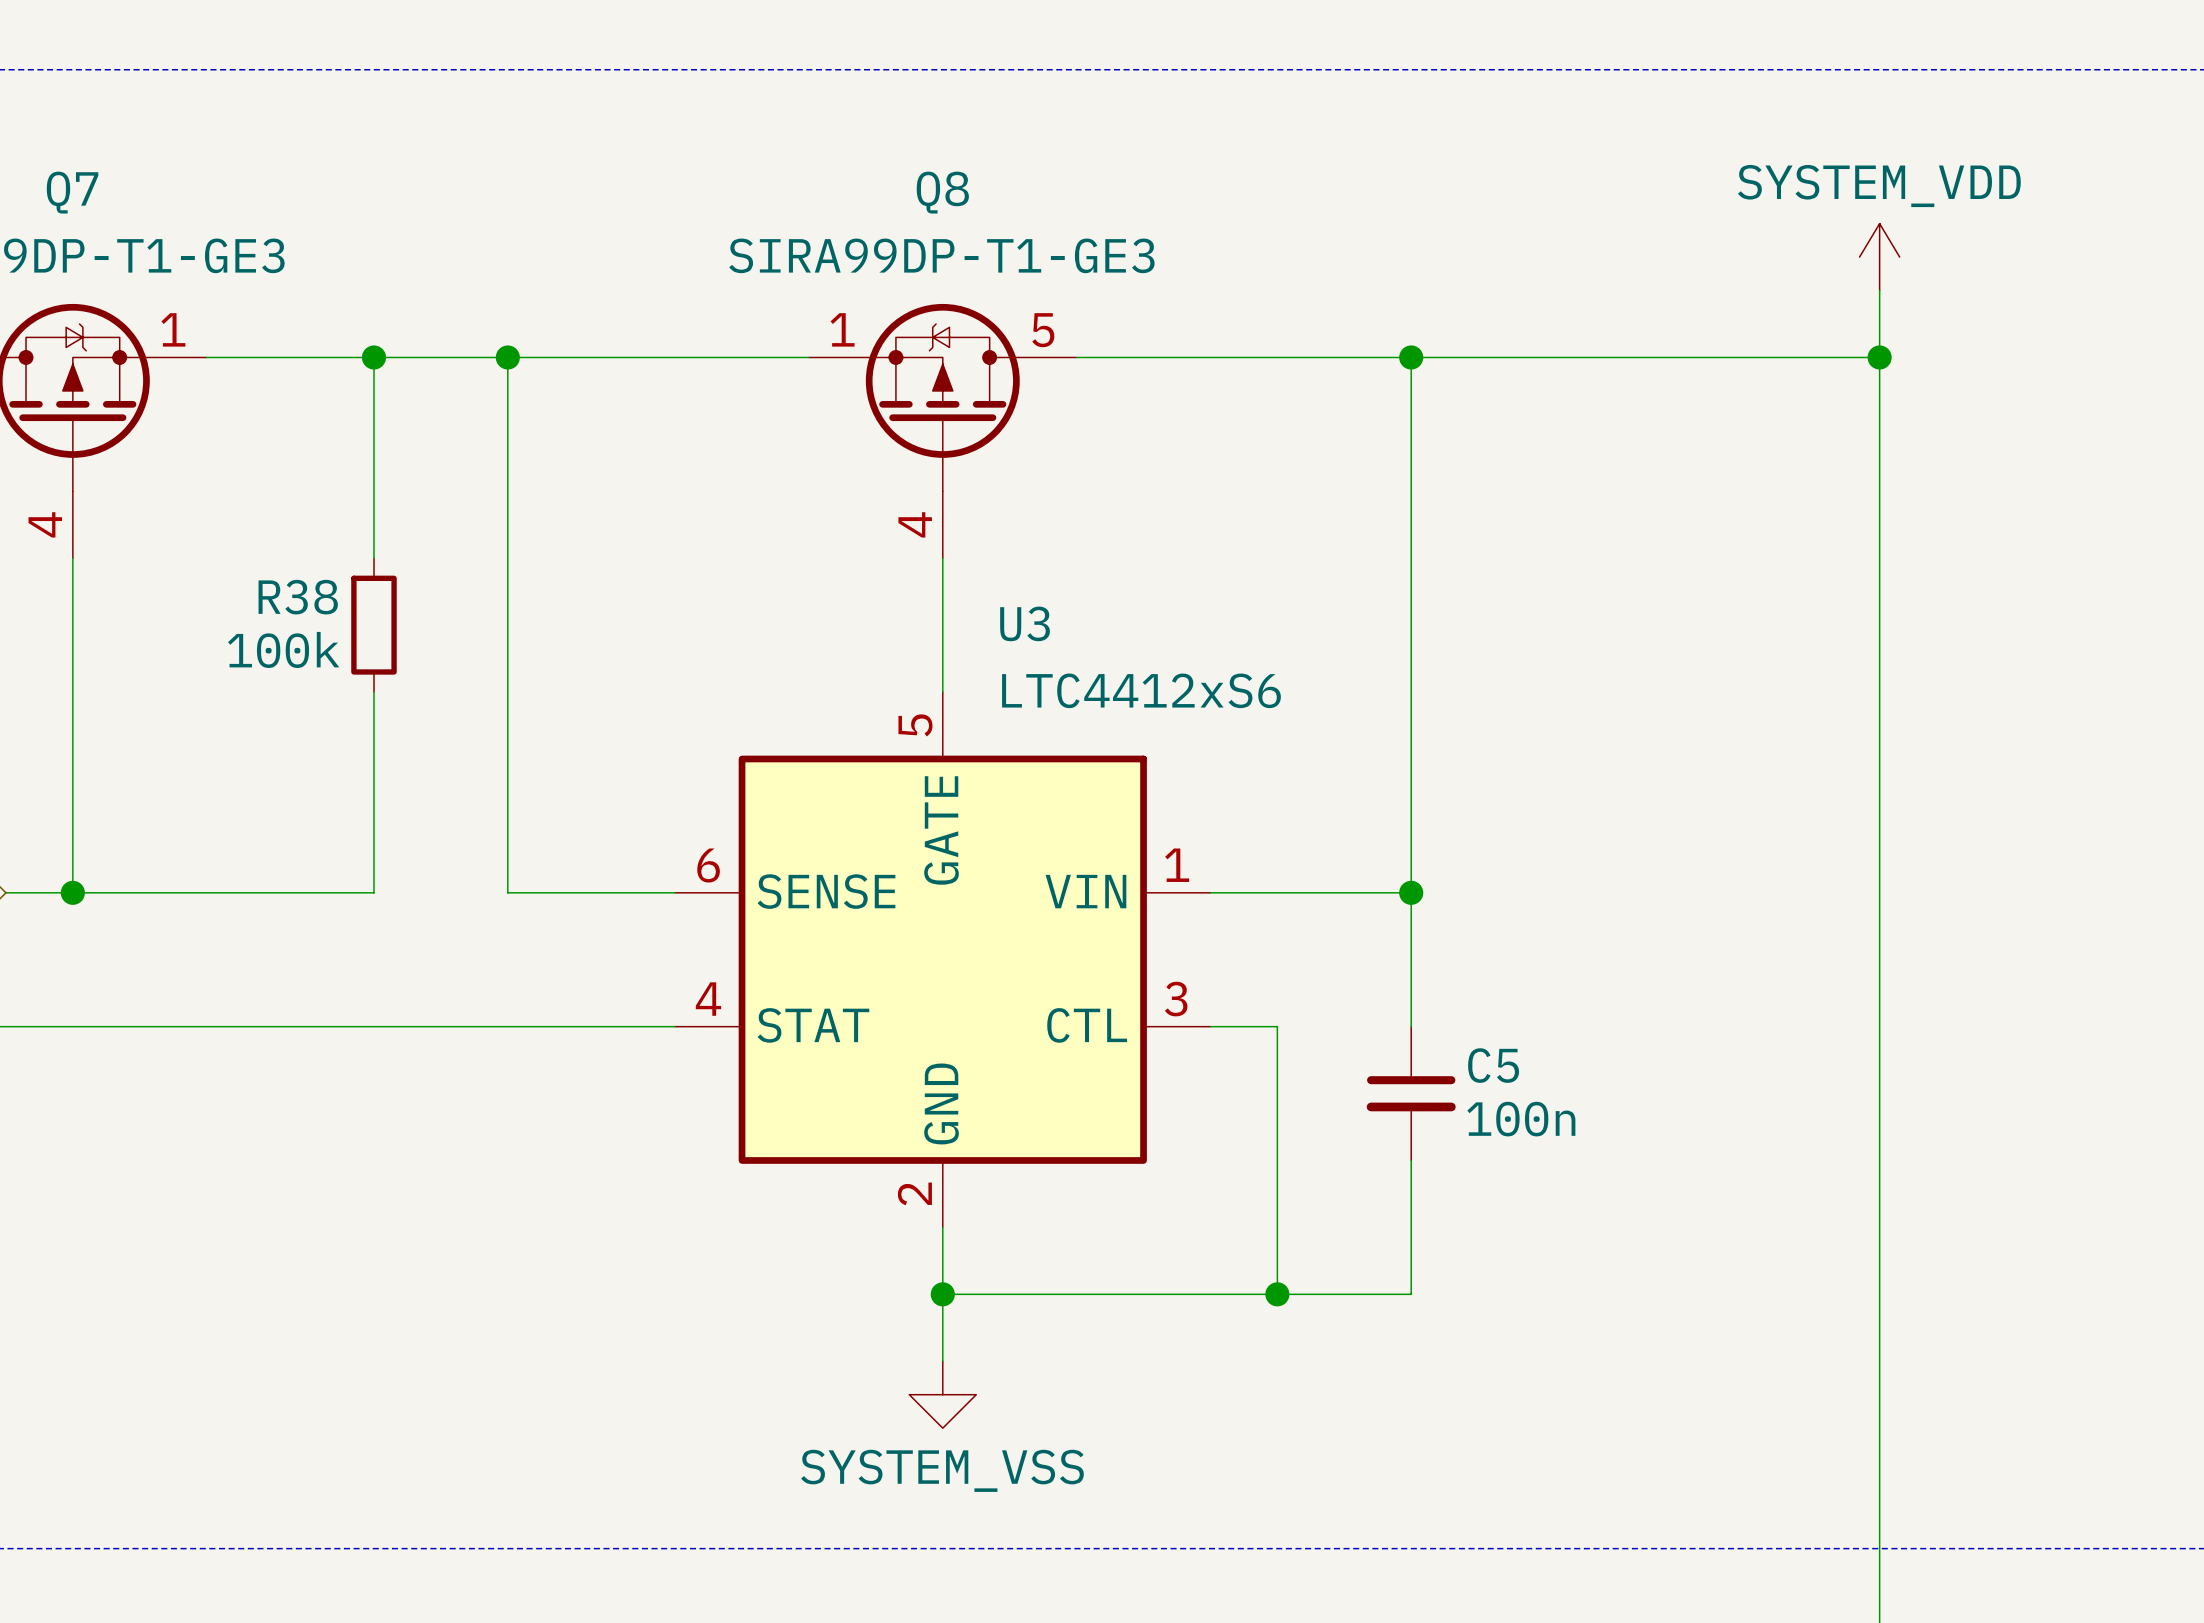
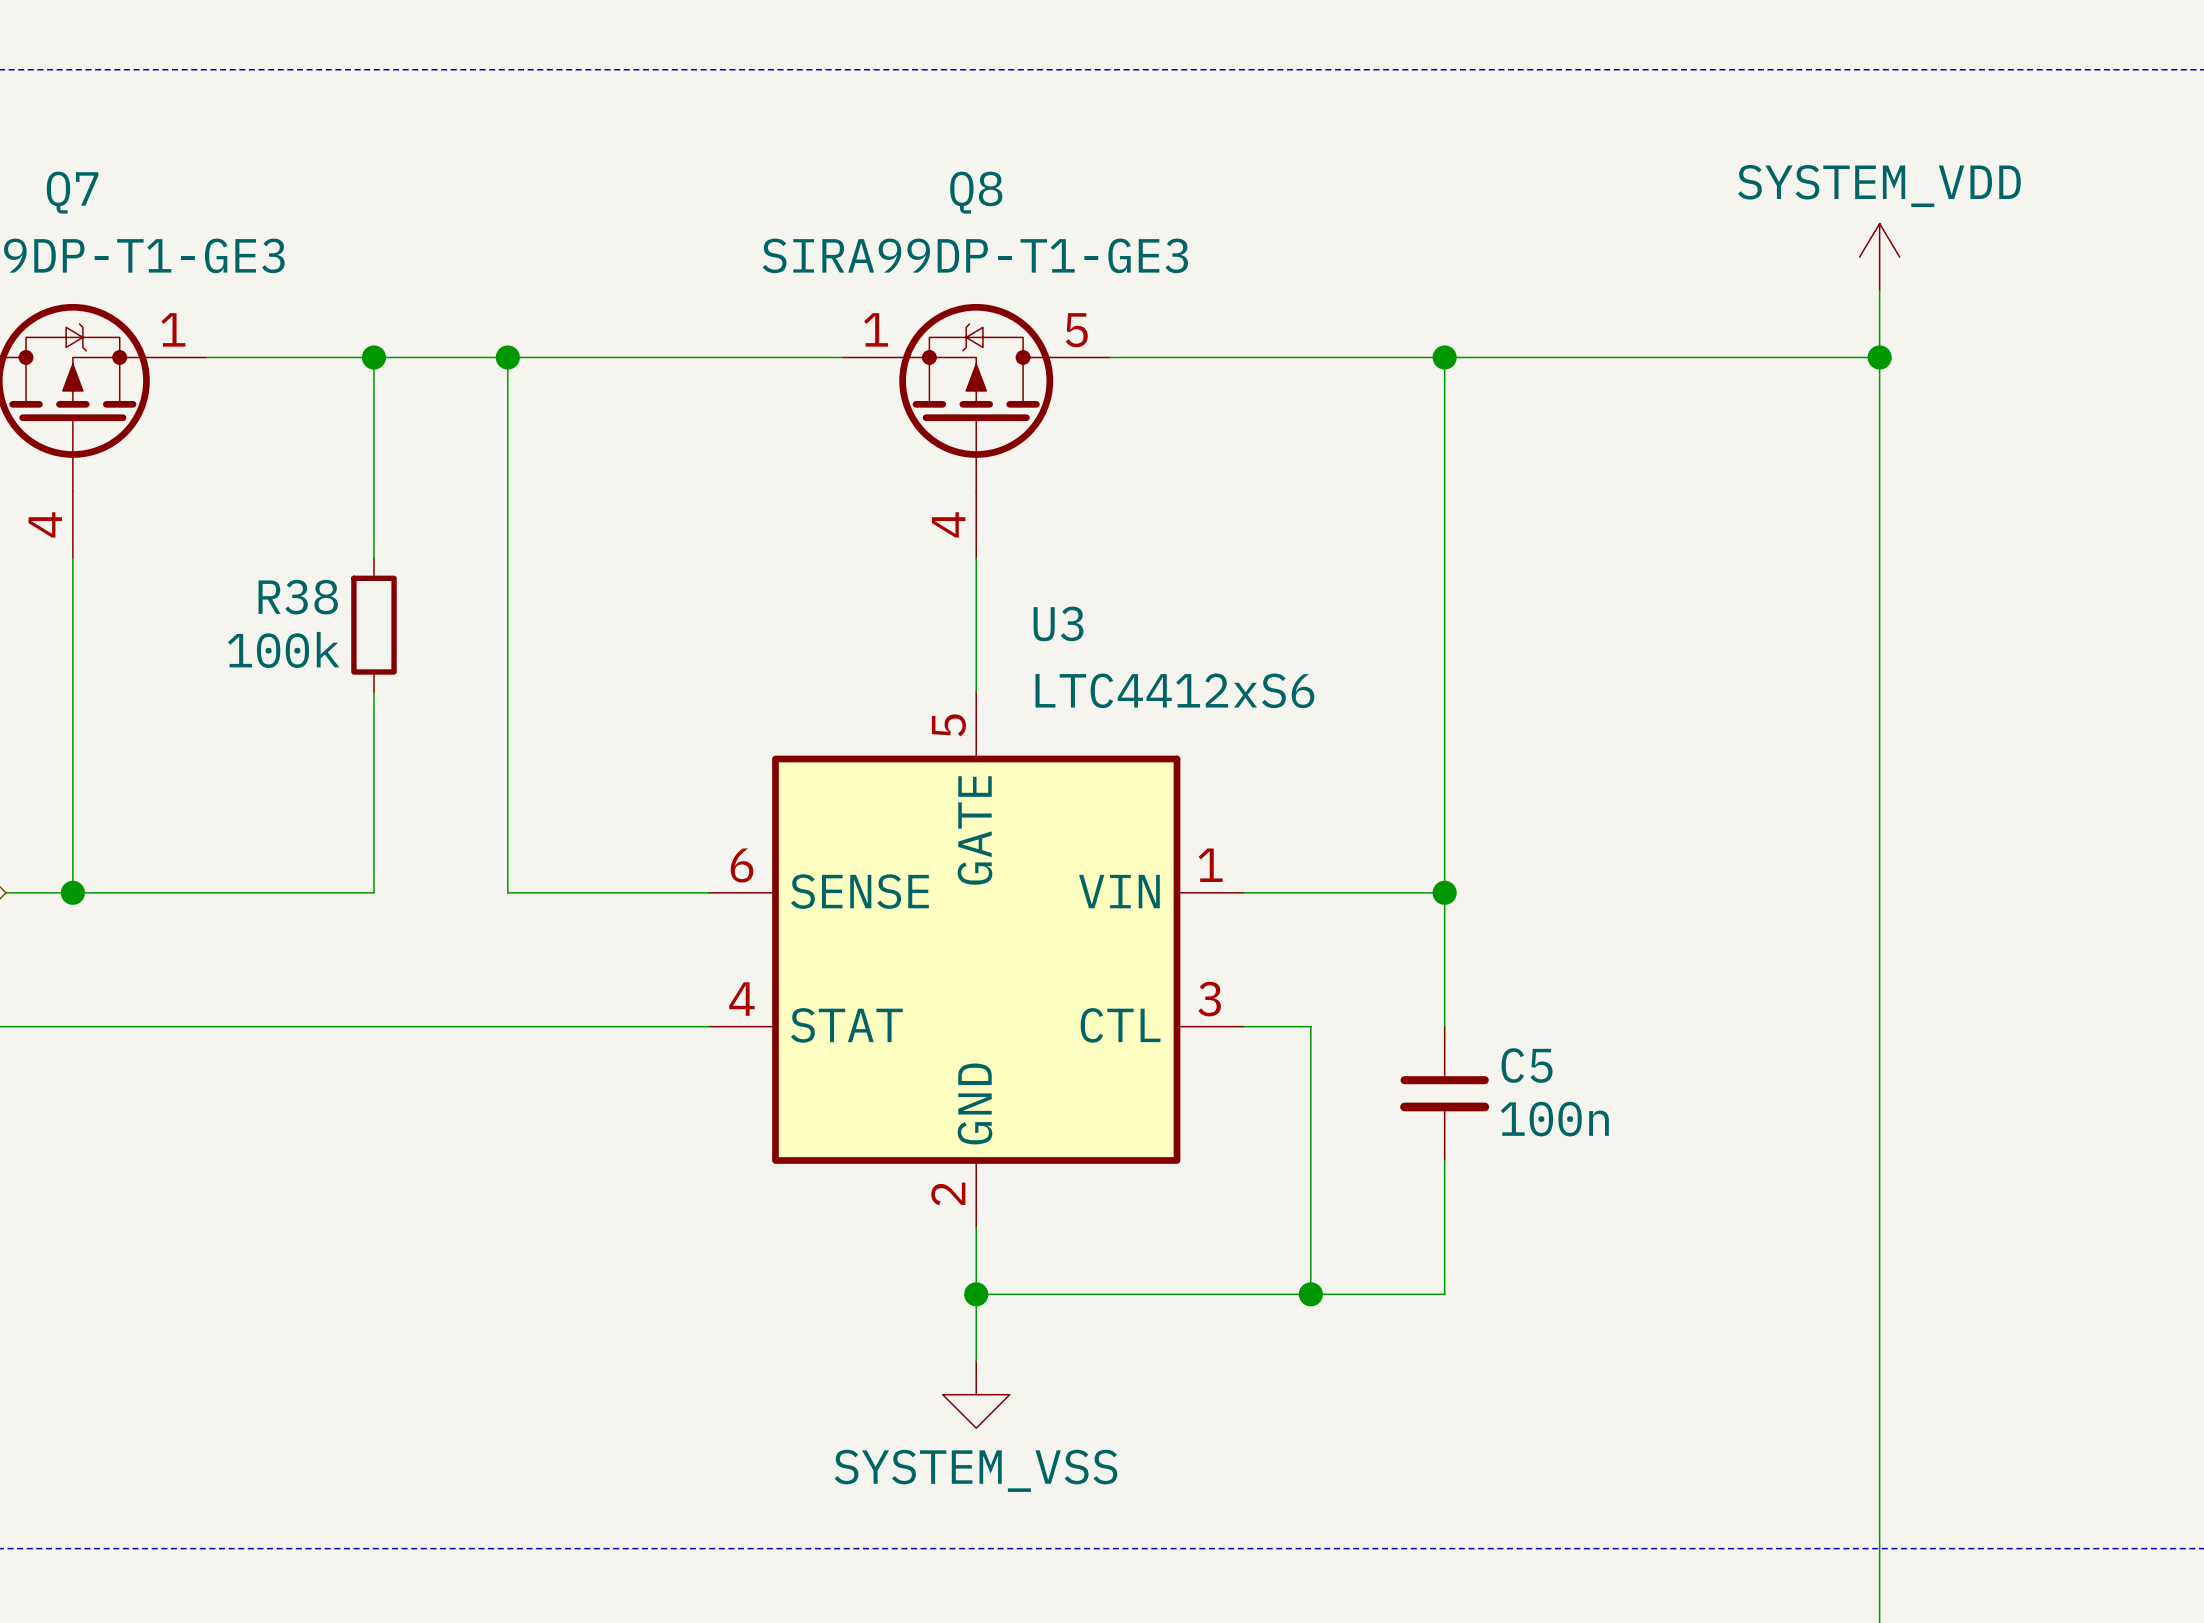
wire: (1411, 357) (1411, 1026) -> (1444, 357) (1444, 1026)
junction position: (1411, 357) -> (1444, 357)
Q8 position: (942, 431) -> (976, 431)
wire: (942, 558) (942, 692) -> (976, 558) (976, 692)
junction position: (1411, 892) -> (1444, 892)
U3 position: (942, 959) -> (976, 959)
wire: (1277, 1026) (1277, 1294) -> (1277, 1026) (1310, 1026) (1310, 1294)
C5 position: (1411, 1093) -> (1444, 1093)
wire: (1411, 1160) (1411, 1294) -> (1444, 1160) (1444, 1294) (1411, 1294)
wire: (942, 1227) (942, 1361) -> (976, 1227) (976, 1361)
wire: (942, 1294) (976, 1294) -> (1411, 892) (1444, 892)
junction position: (942, 1294) -> (976, 1294)
junction position: (1277, 1294) -> (1310, 1294)
power symbol position: SYSTEM_VSS (942, 1394) -> SYSTEM_VSS (976, 1394)

